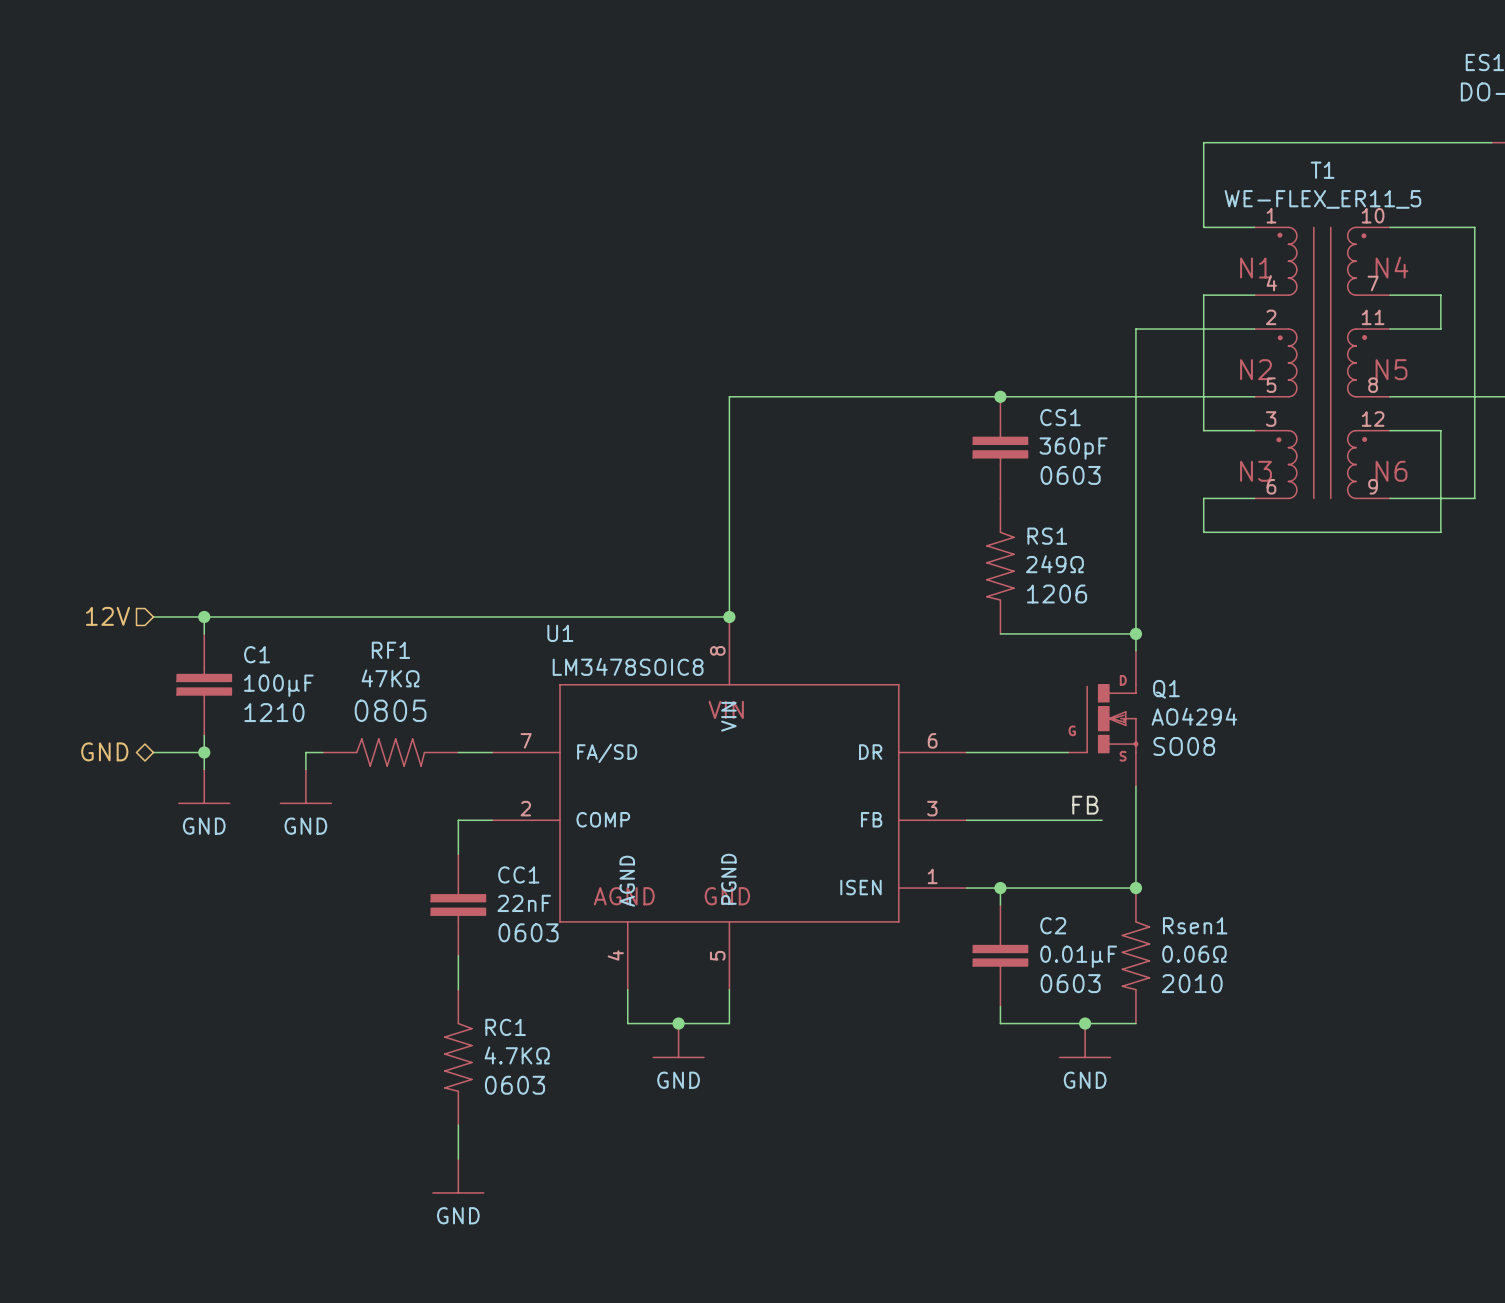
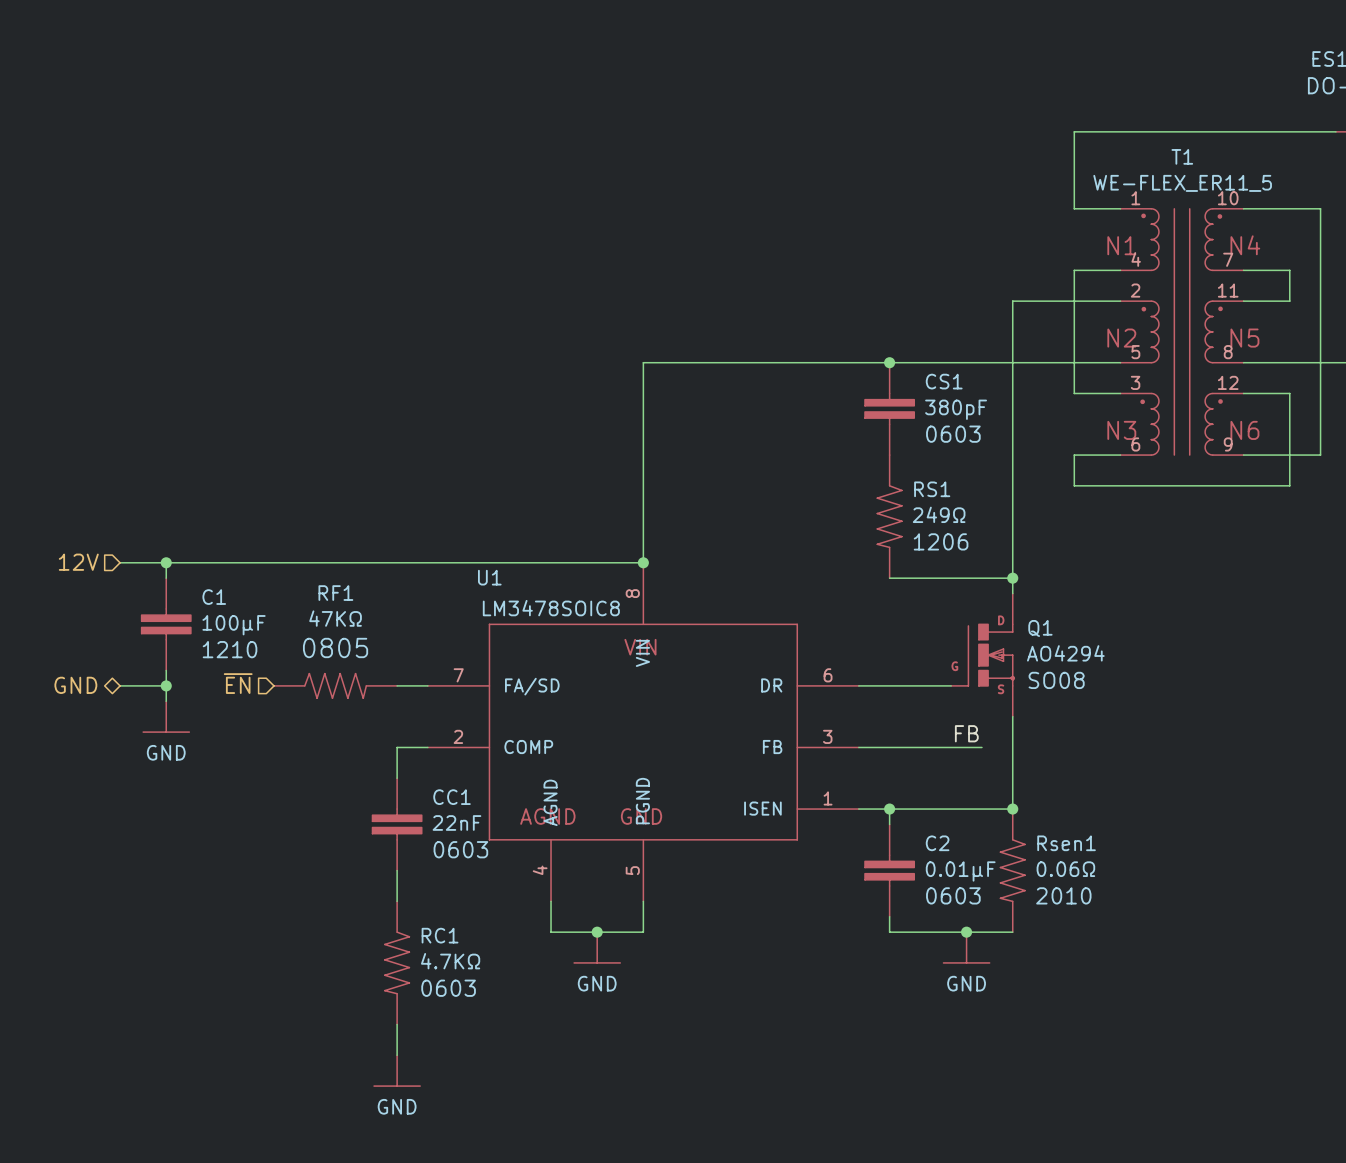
CS1 value: 360pF (1073, 448) -> 380pF (956, 409)
hierarchical label: none -> ~{EN} (238, 683)
wire: (322, 752) (305, 752) (305, 769) -> none
power symbol: GND (305, 786) -> none

